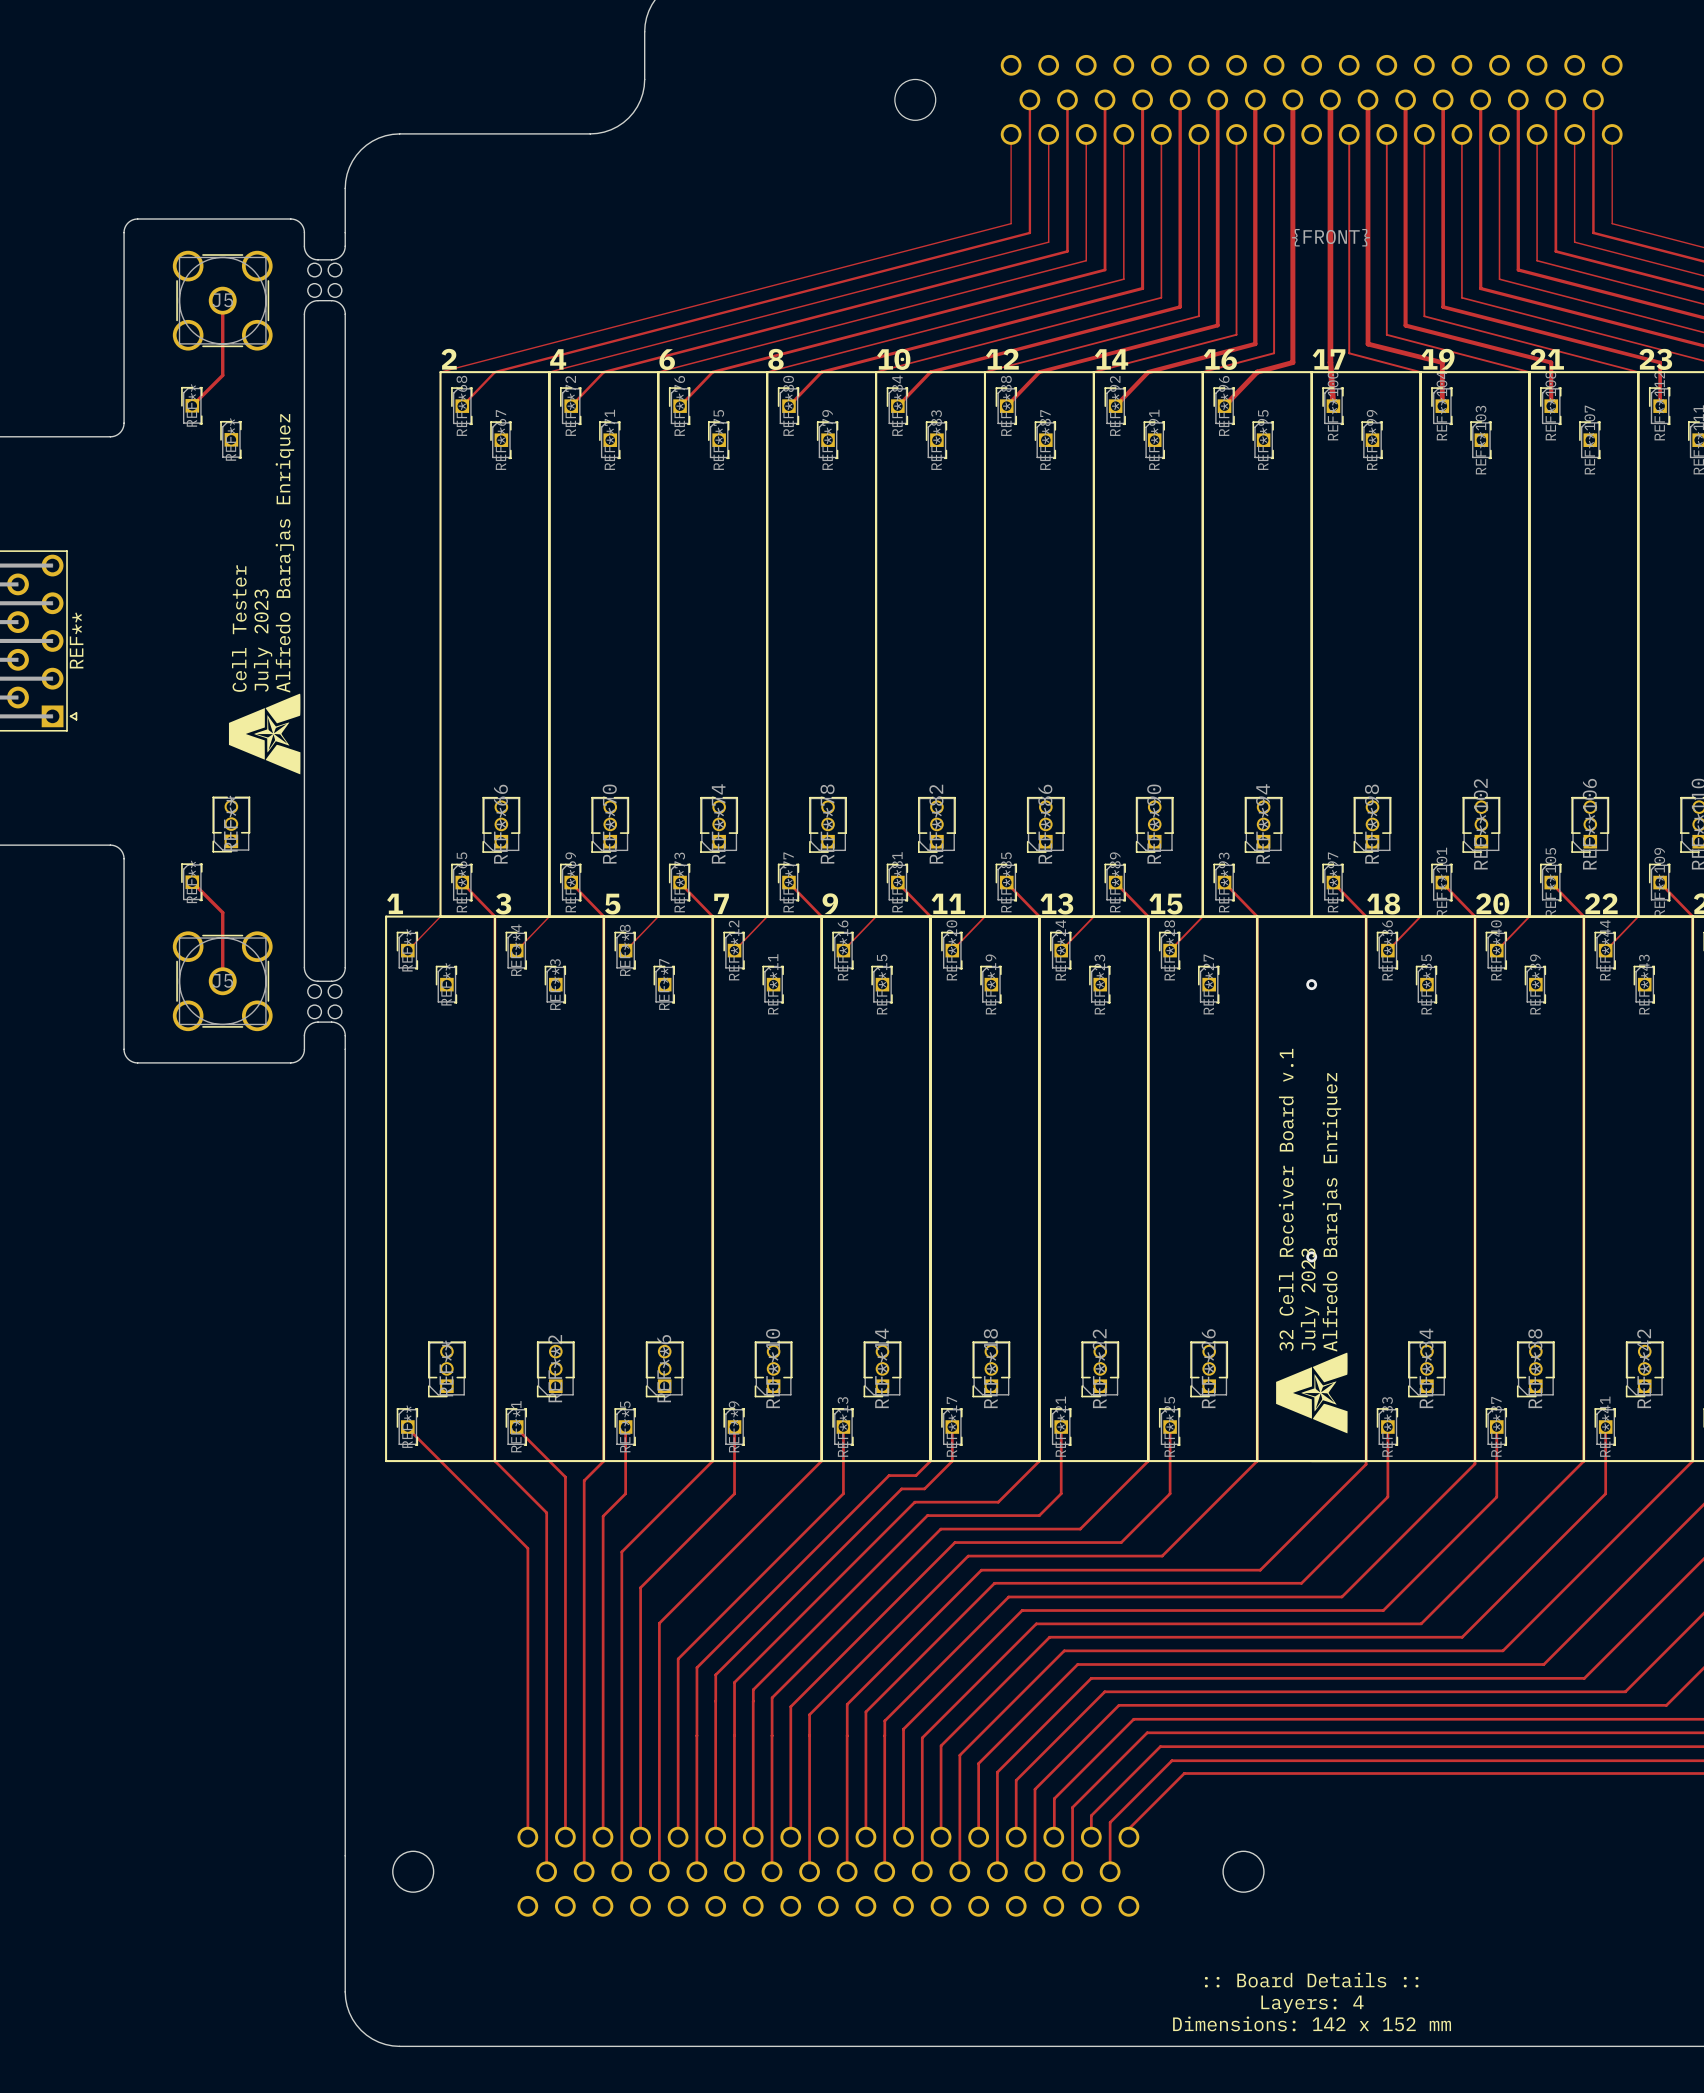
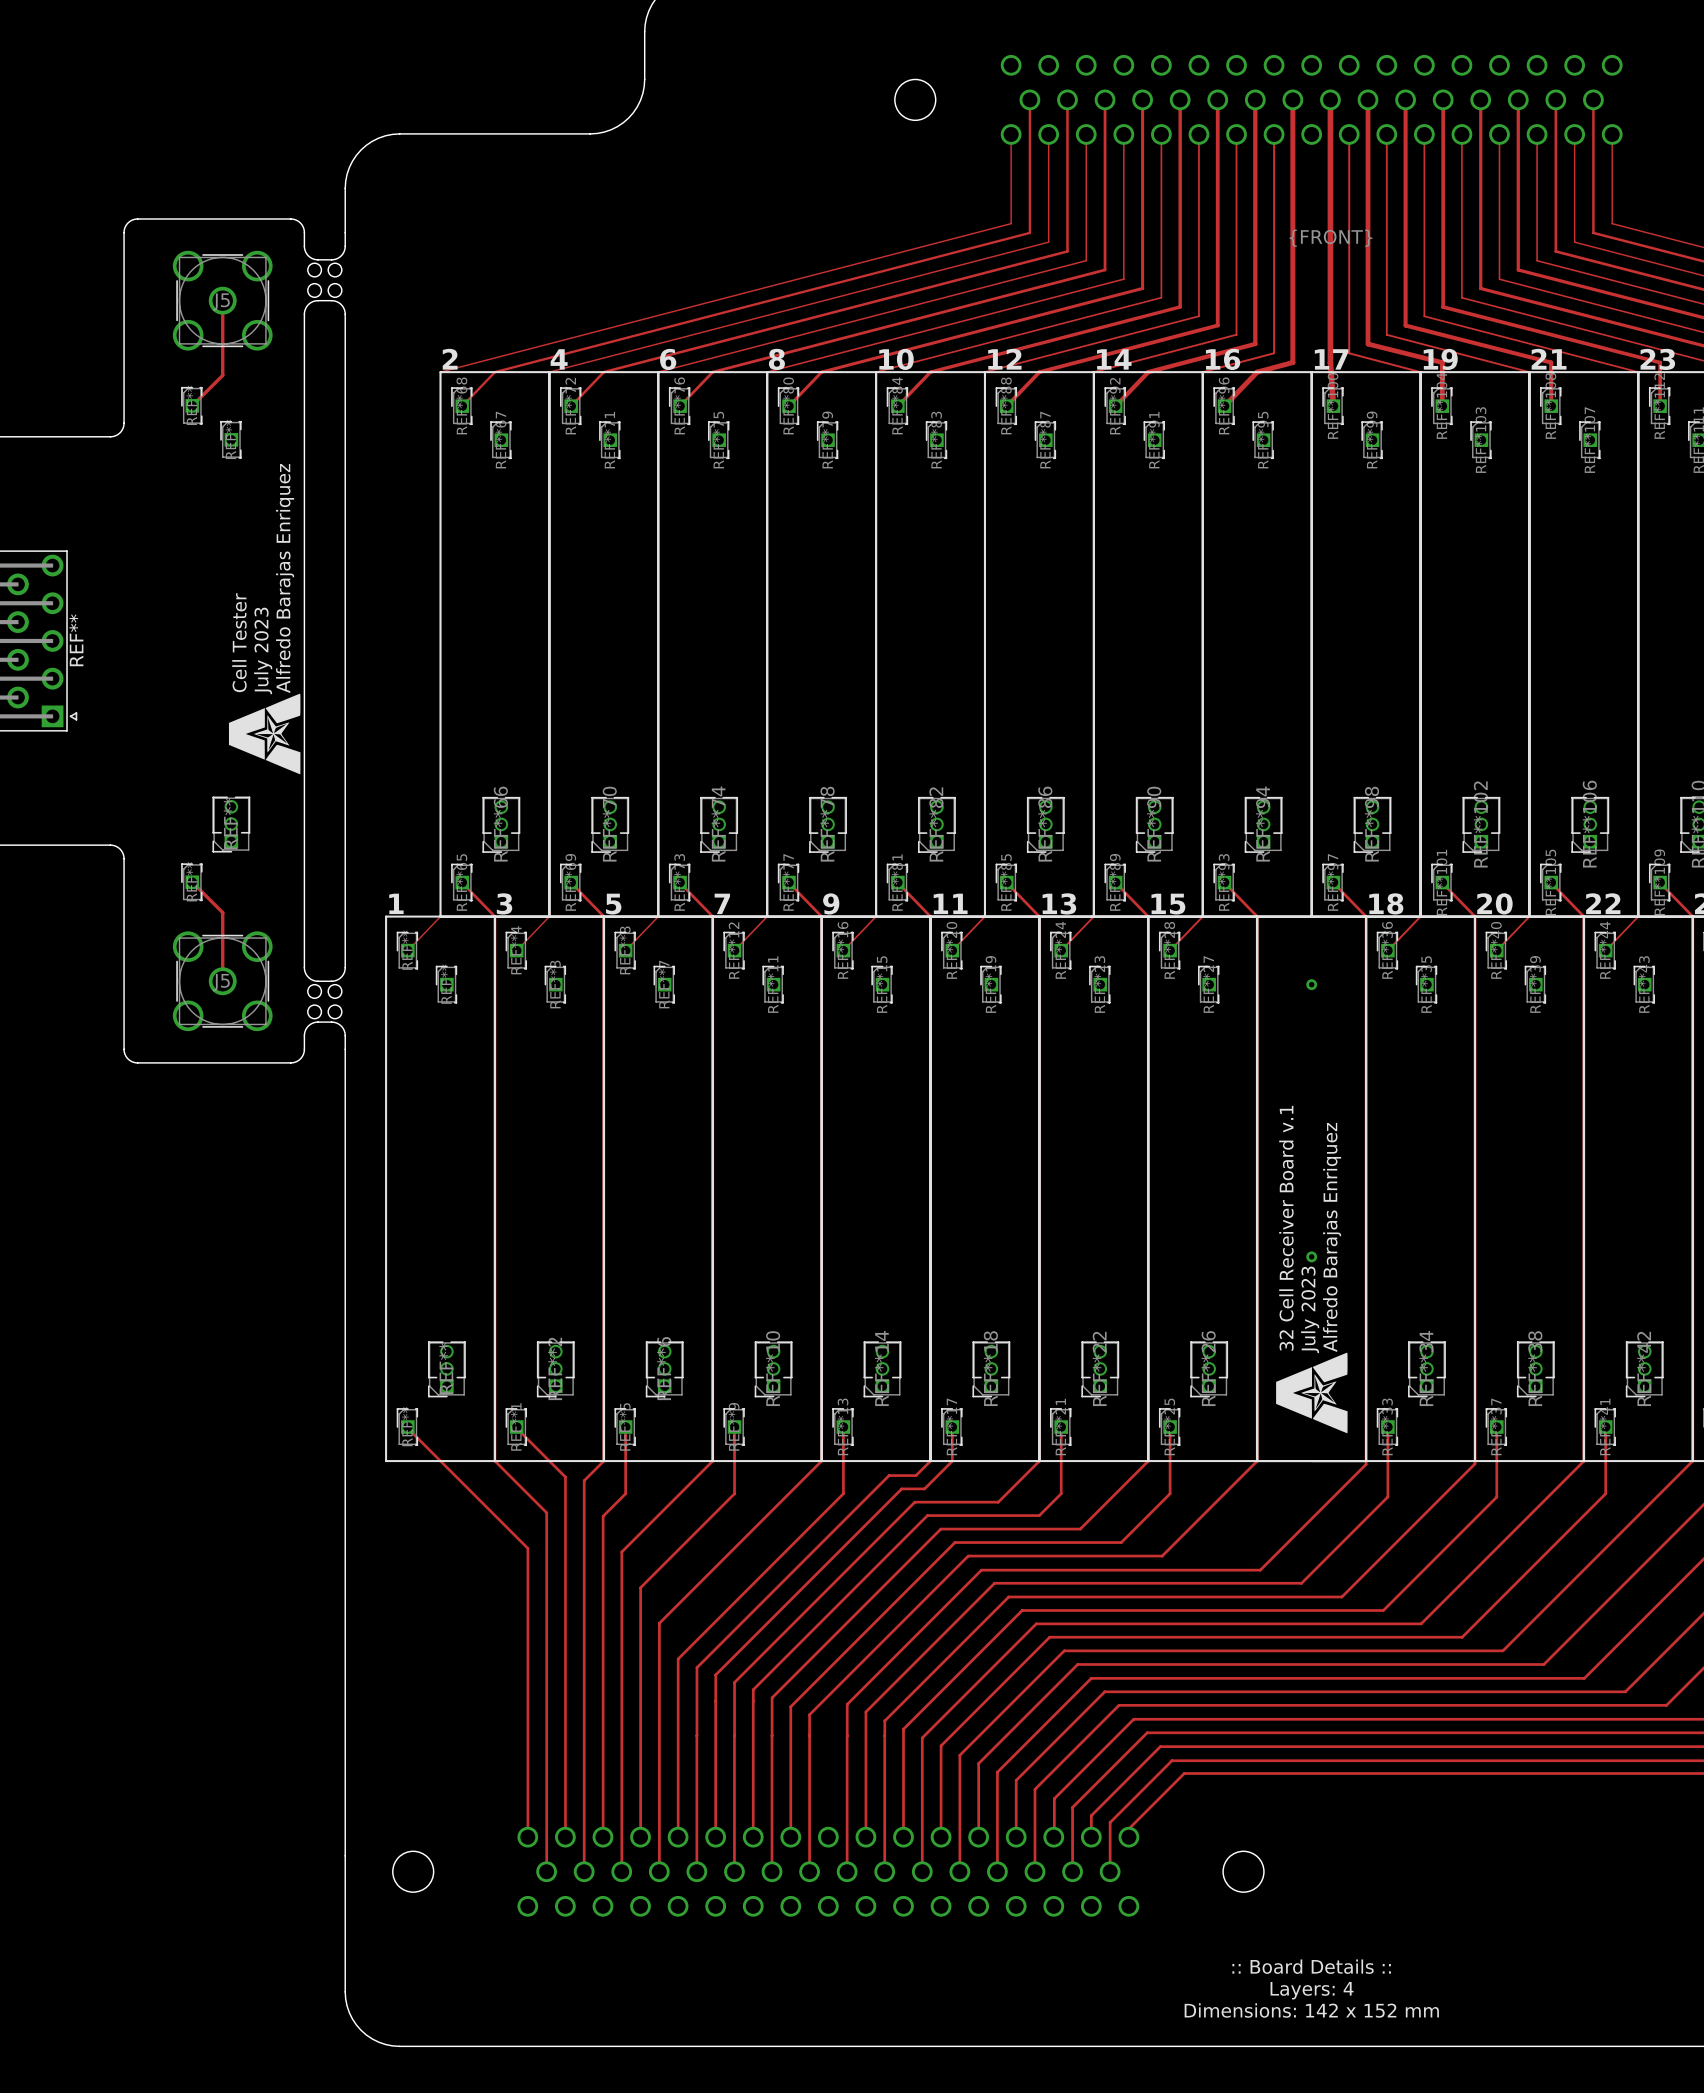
text position: :: Board Details :: (1311, 1980) -> :: Board Details :: (1311, 1966)
text position: Layers: 4 (1312, 2004) -> Layers: 4 (1312, 1990)
text position: Dimensions: 142 x 152 mm (1312, 2023) -> Dimensions: 142 x 152 mm (1311, 2010)

